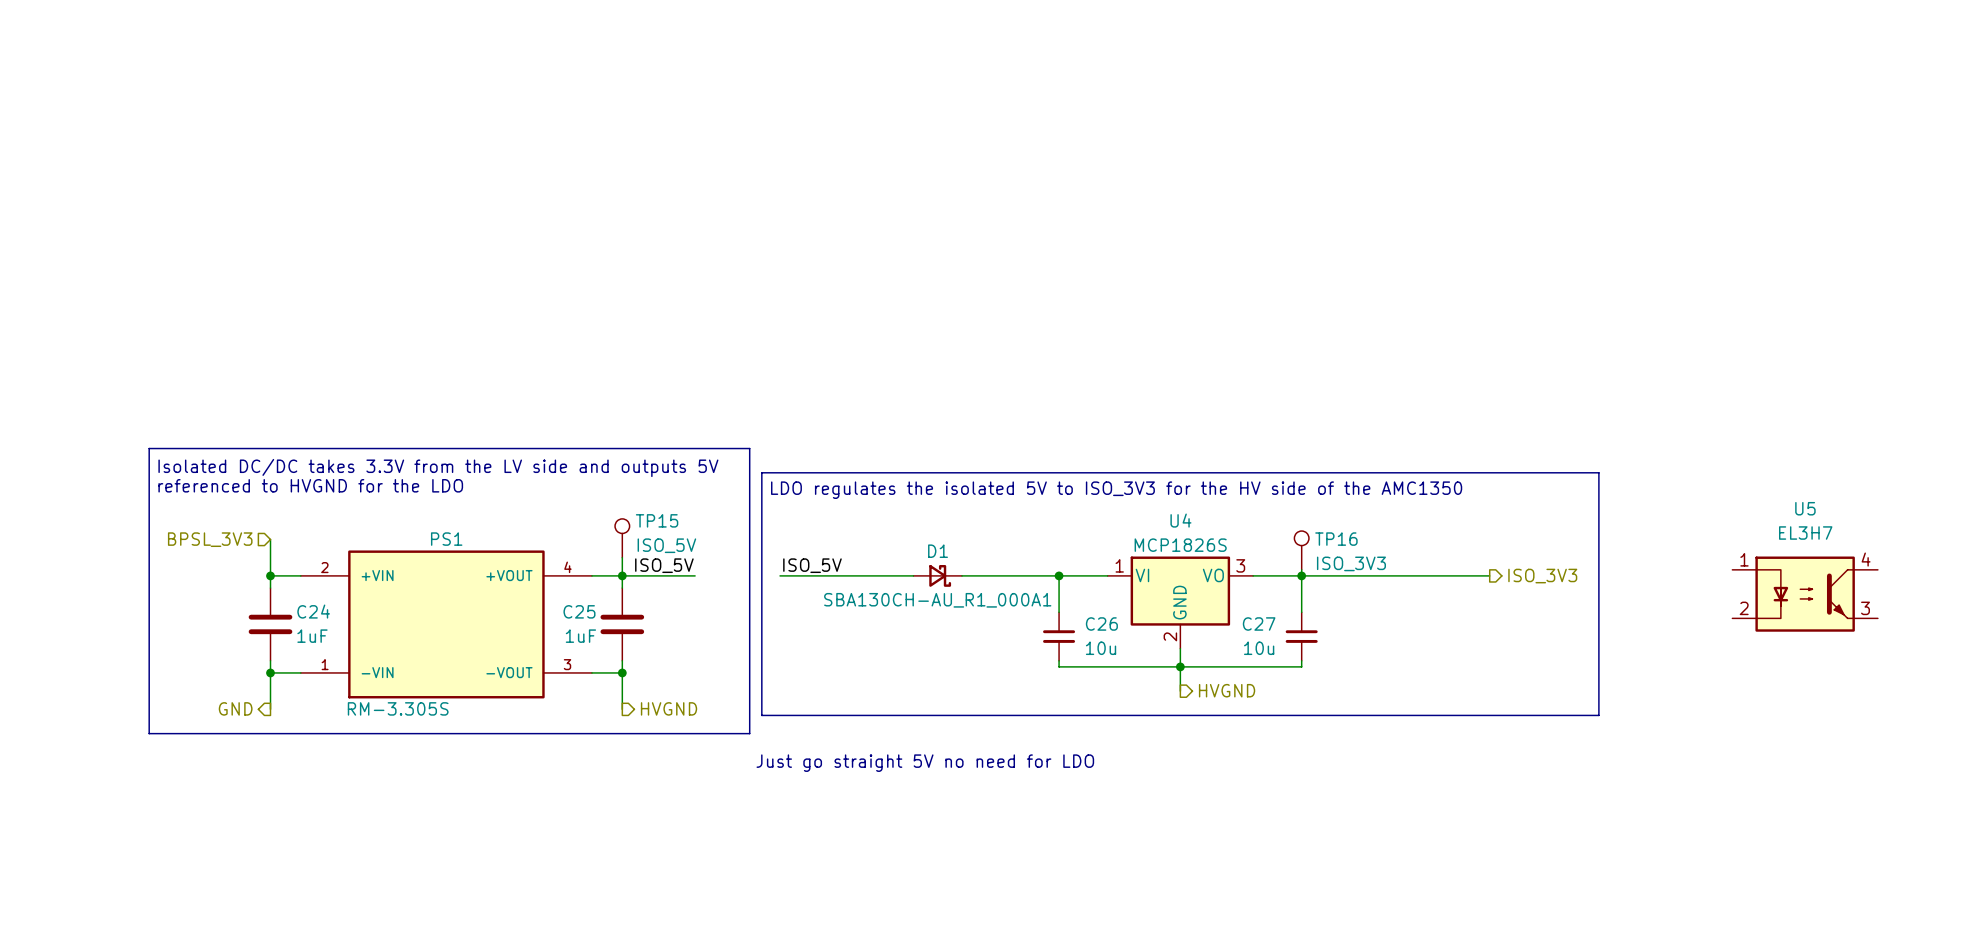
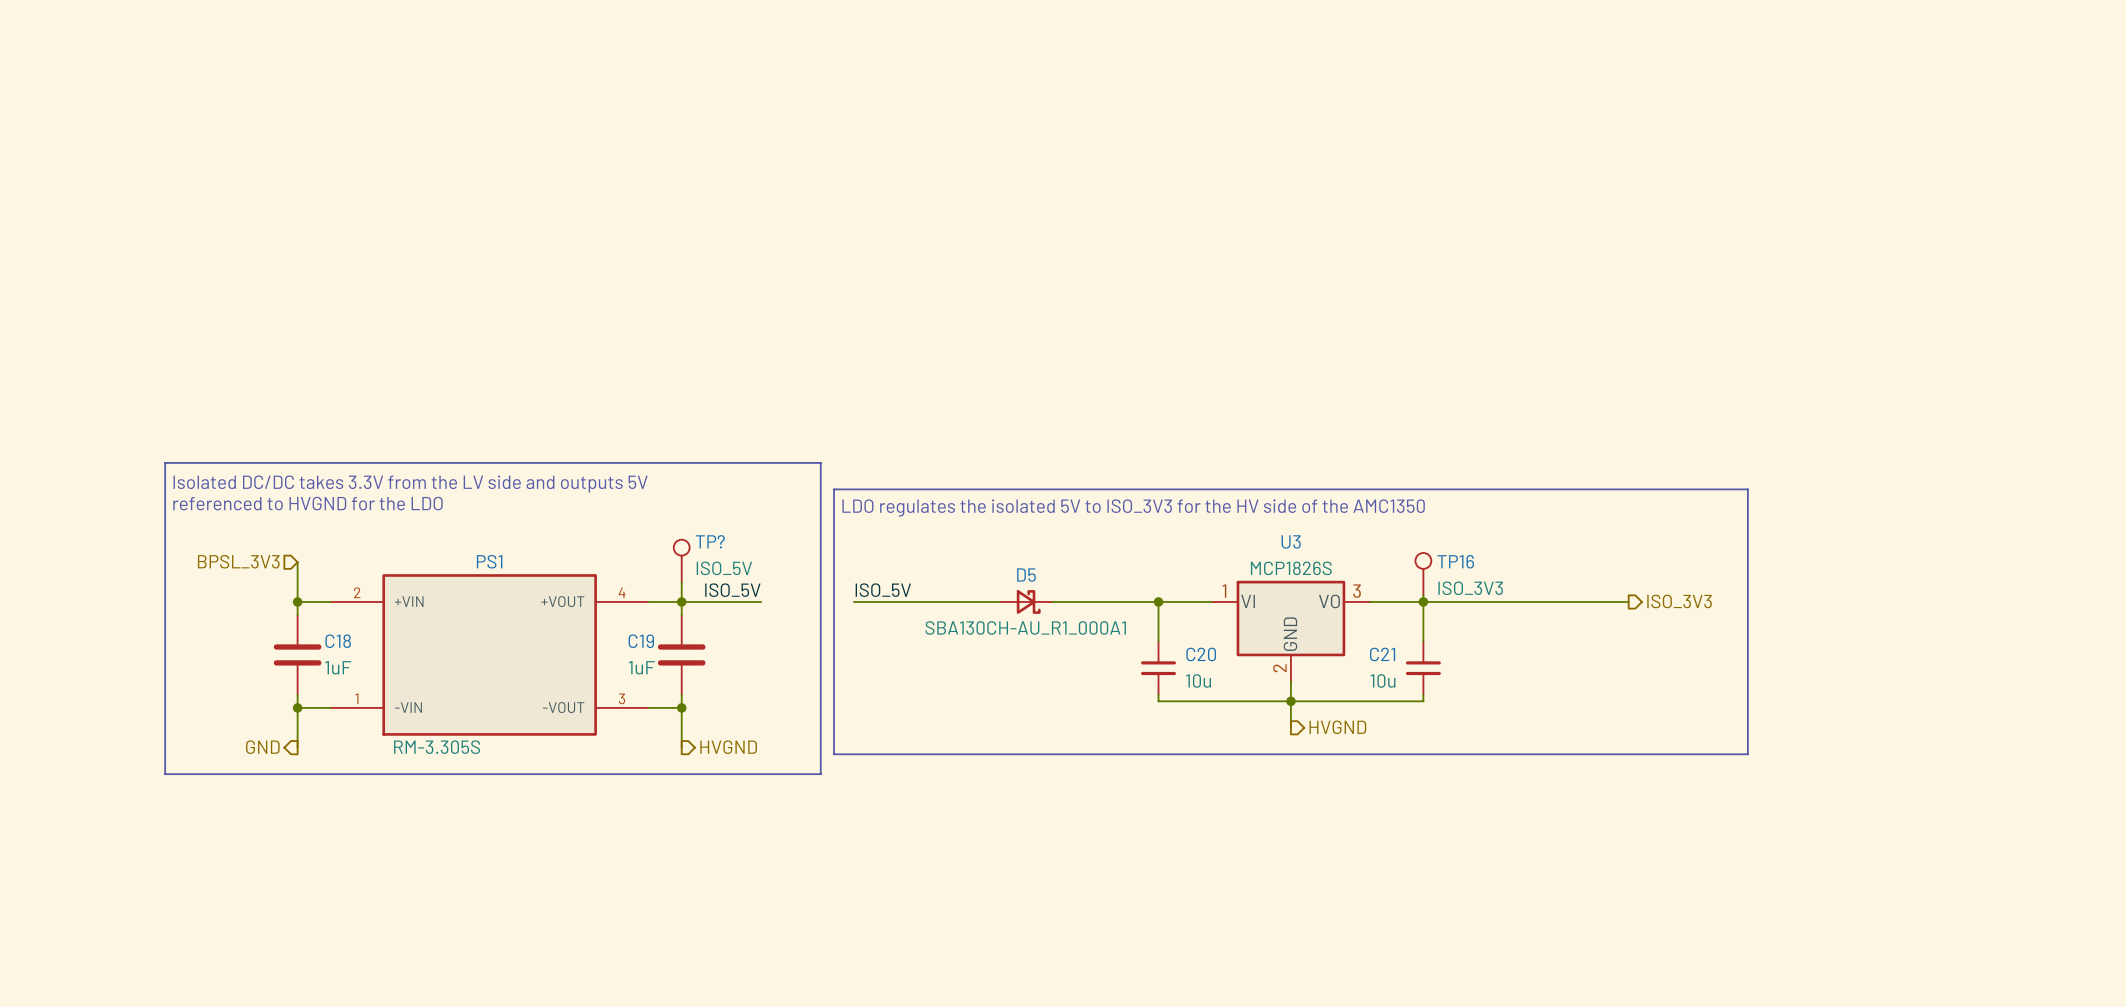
TP15 name: TP15 (657, 520) -> TP? (710, 541)
U4 name: U4 (1180, 520) -> U3 (1291, 541)
D1 name: D1 (938, 551) -> D5 (1026, 575)
U5: EL3H7 (1805, 594) -> none
C24 name: C24 (313, 611) -> C18 (338, 641)
C25 name: C25 (579, 611) -> C19 (641, 641)
C26 name: C26 (1101, 623) -> C20 (1201, 654)
C27 name: C27 (1259, 623) -> C21 (1382, 654)
text: Just go straight 5V no need for LDO (925, 763) -> none

